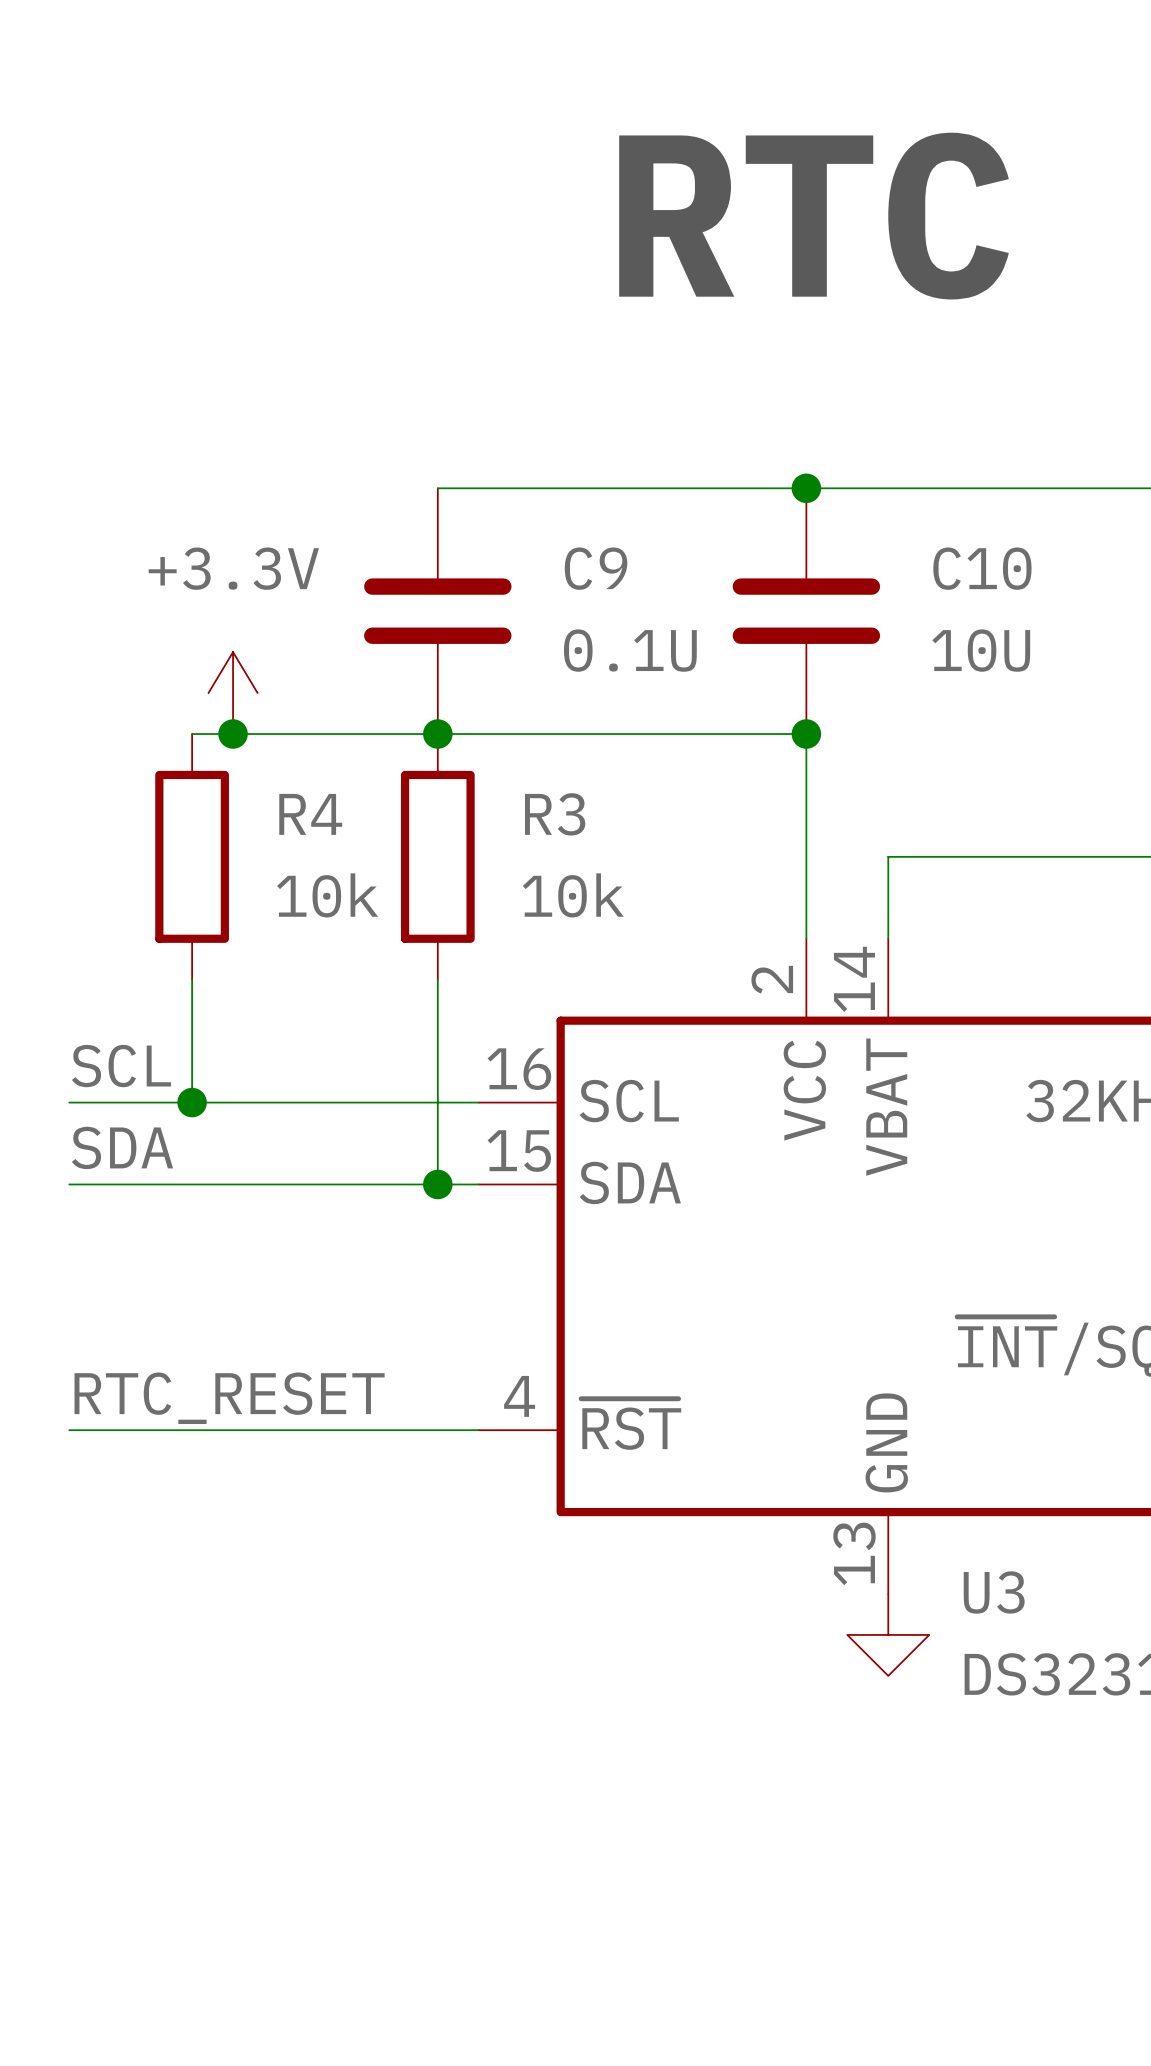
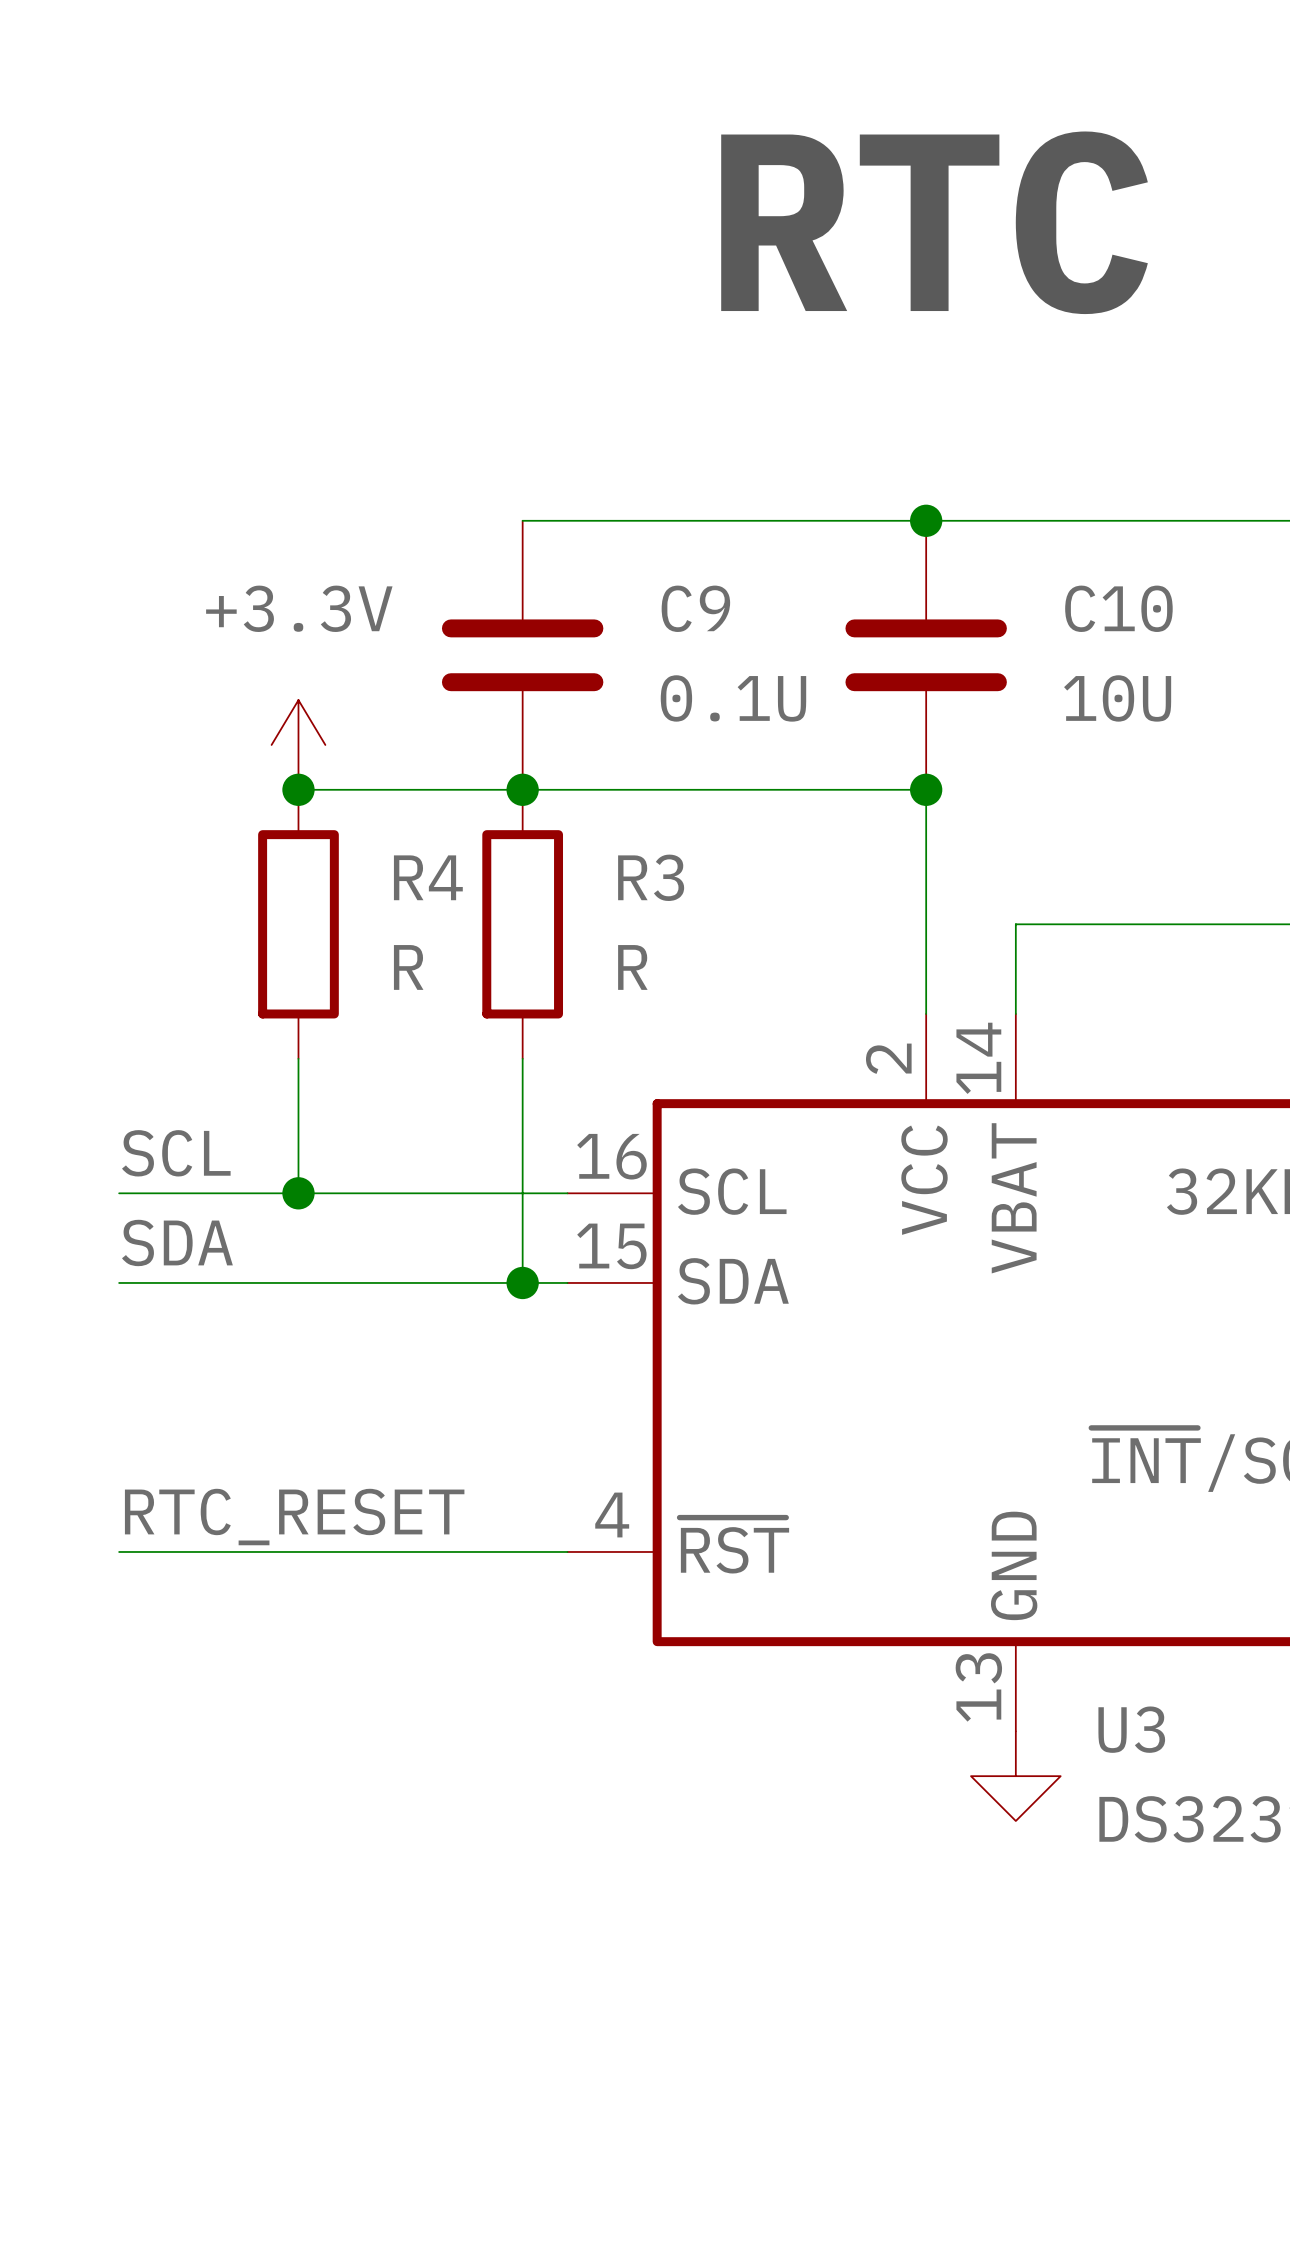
wire: (192, 734) (233, 734) -> none
R4 position: (192, 856) -> (298, 924)
R4 value: 10k (327, 895) -> R (408, 967)
R3 value: 10k (573, 895) -> R (632, 967)
wire: (192, 979) (192, 1102) -> (298, 1058) (298, 1193)
junction position: (192, 1102) -> (298, 1193)

